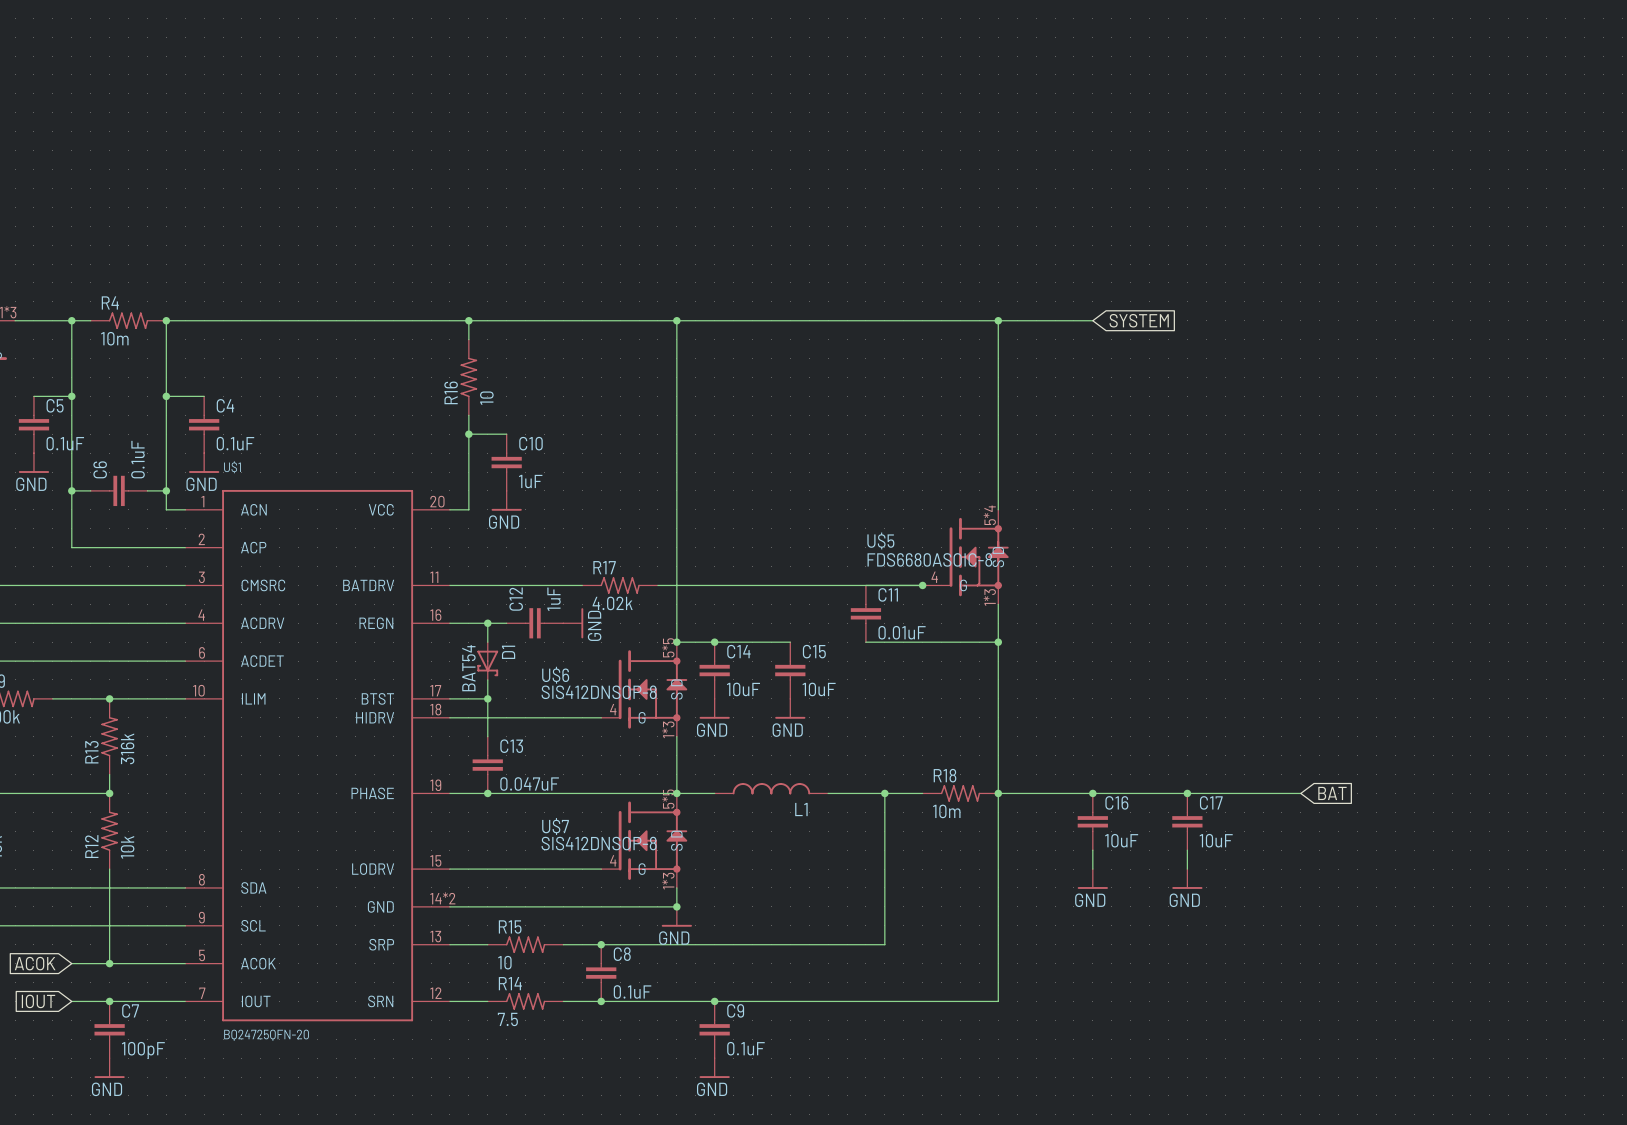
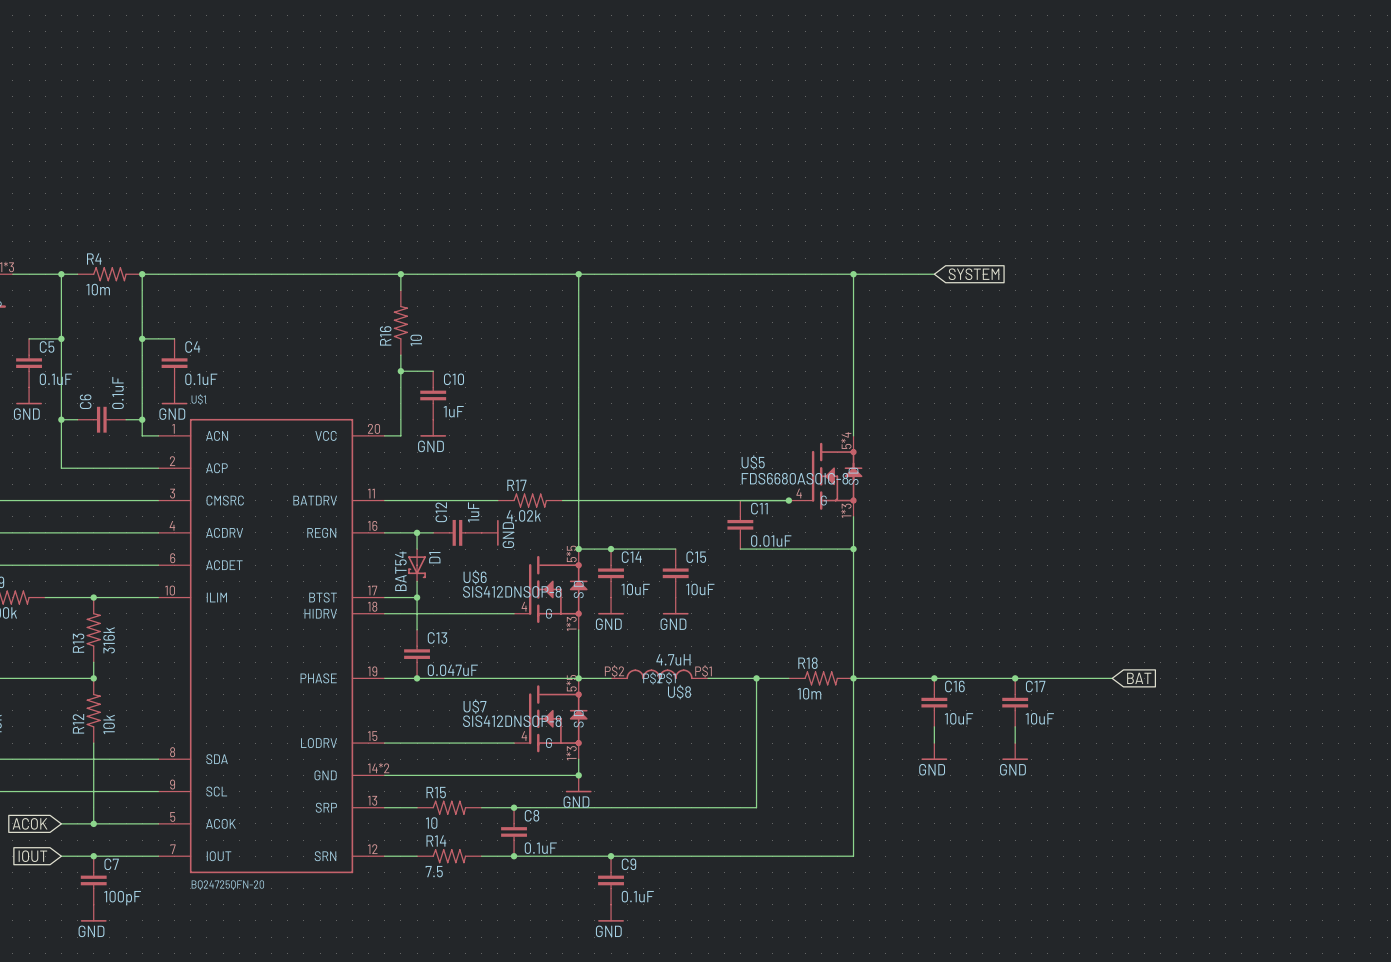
L1 value: none -> 4.7uH (673, 659)
L1 pin number: none -> P$2 (614, 671)
L1 pin number: none -> P$1 (703, 671)
L1 pin name: none -> P$2 (652, 678)
L1 pin name: none -> P$1 (667, 678)
L1 name: L1 (801, 809) -> U$8 (679, 692)

